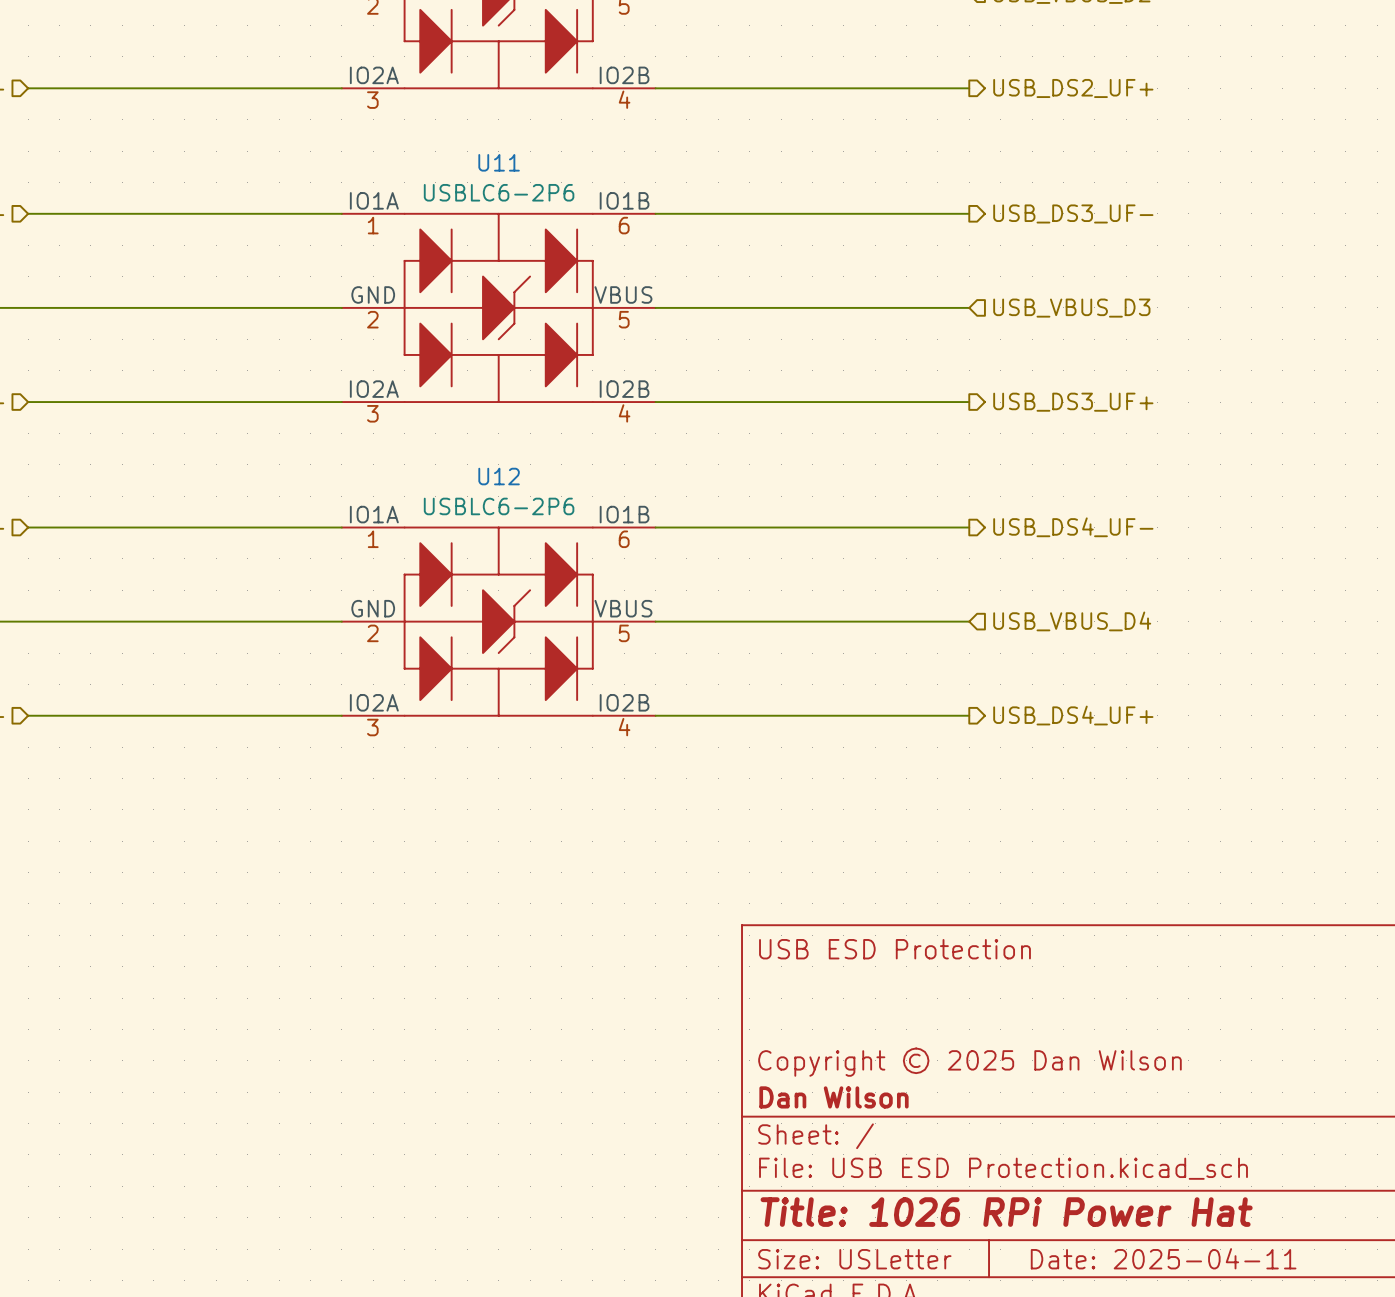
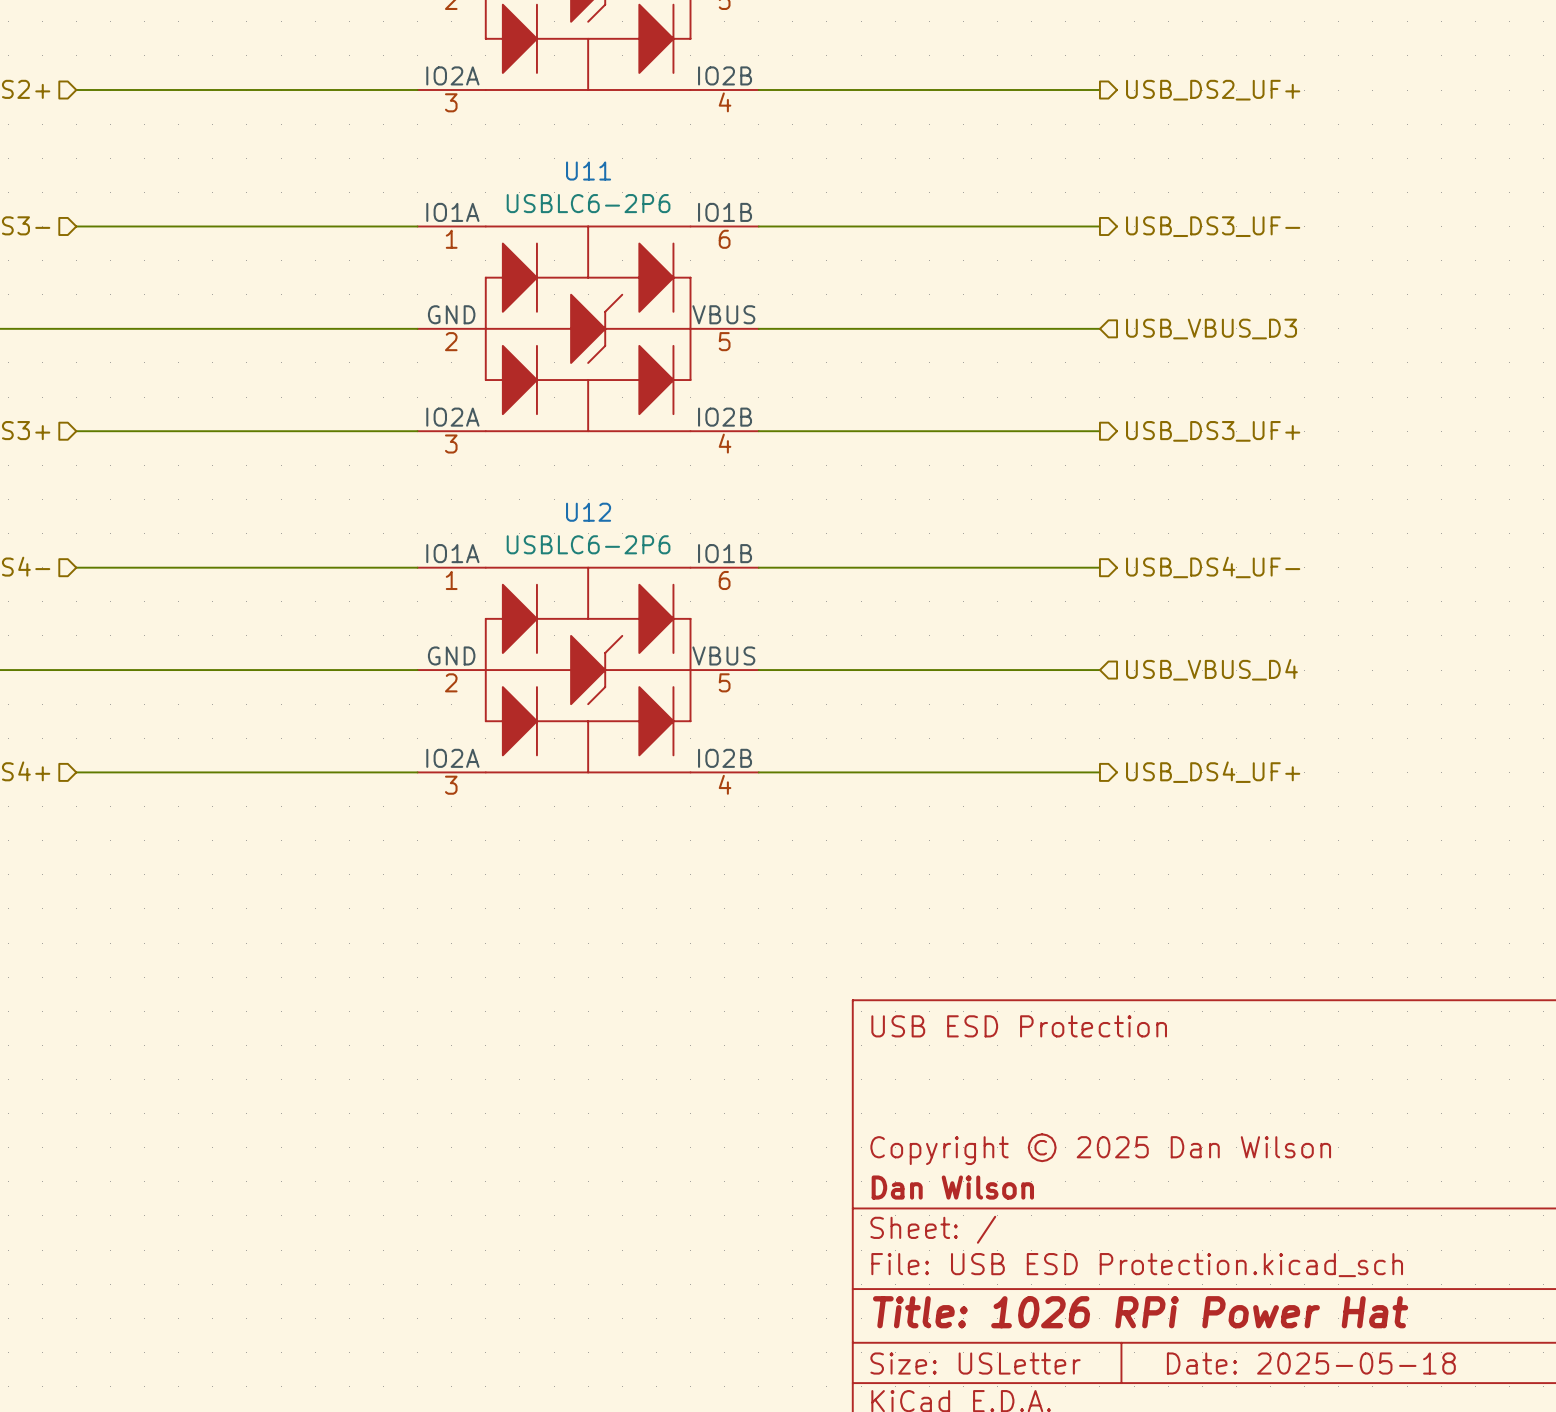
title block: Date: 2025-04-11 (1163, 1258) -> Date: 2025-05-18 (1311, 1363)

